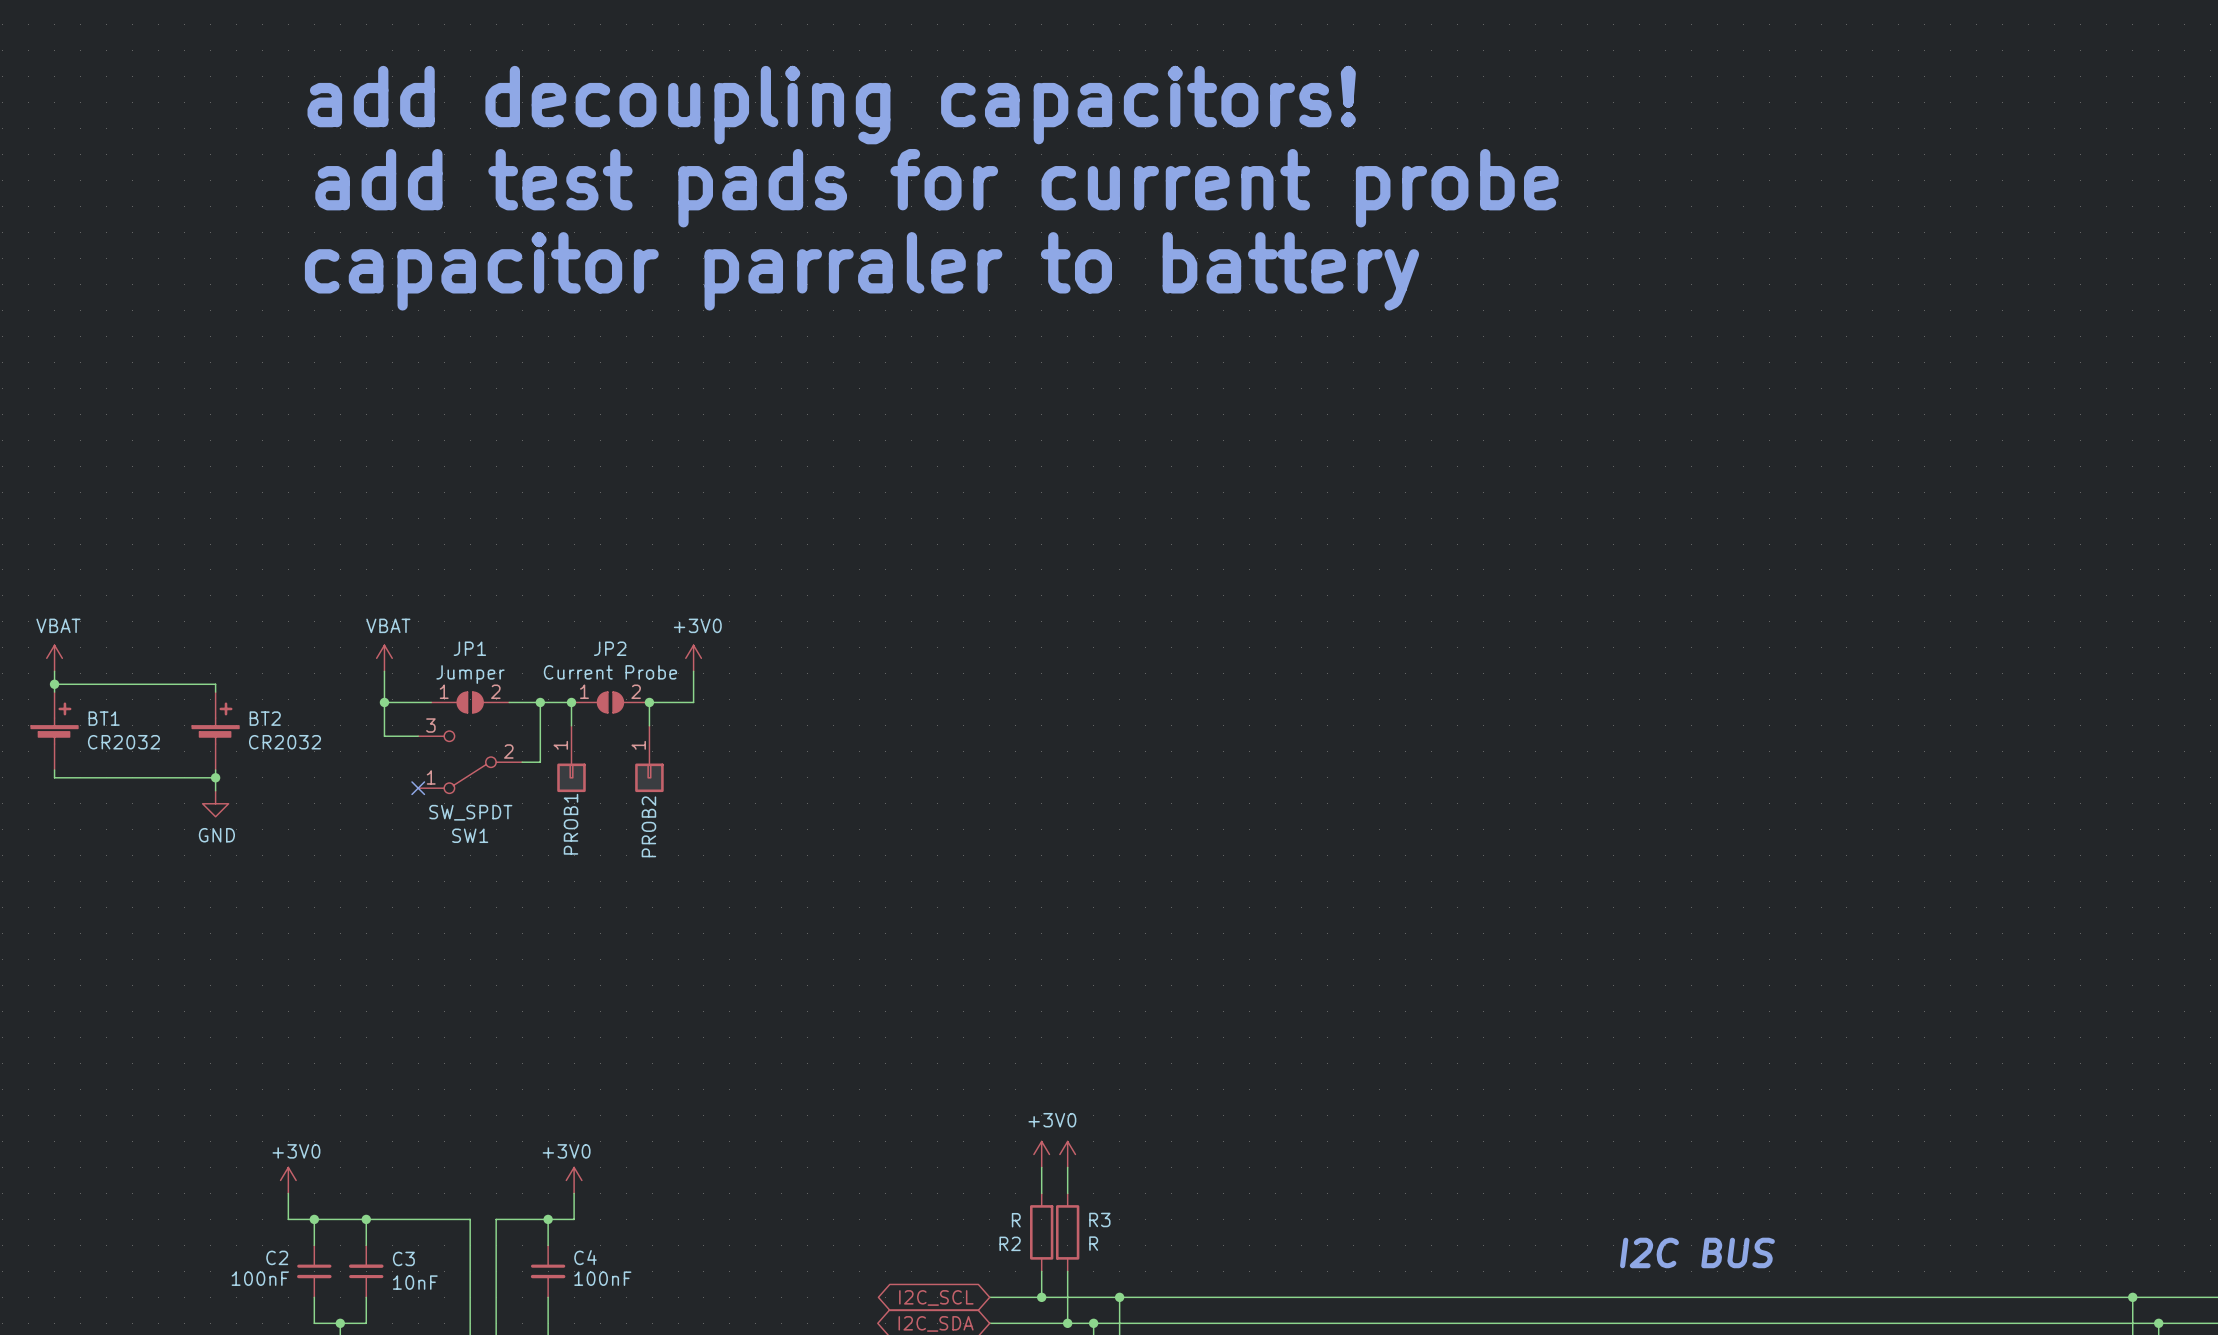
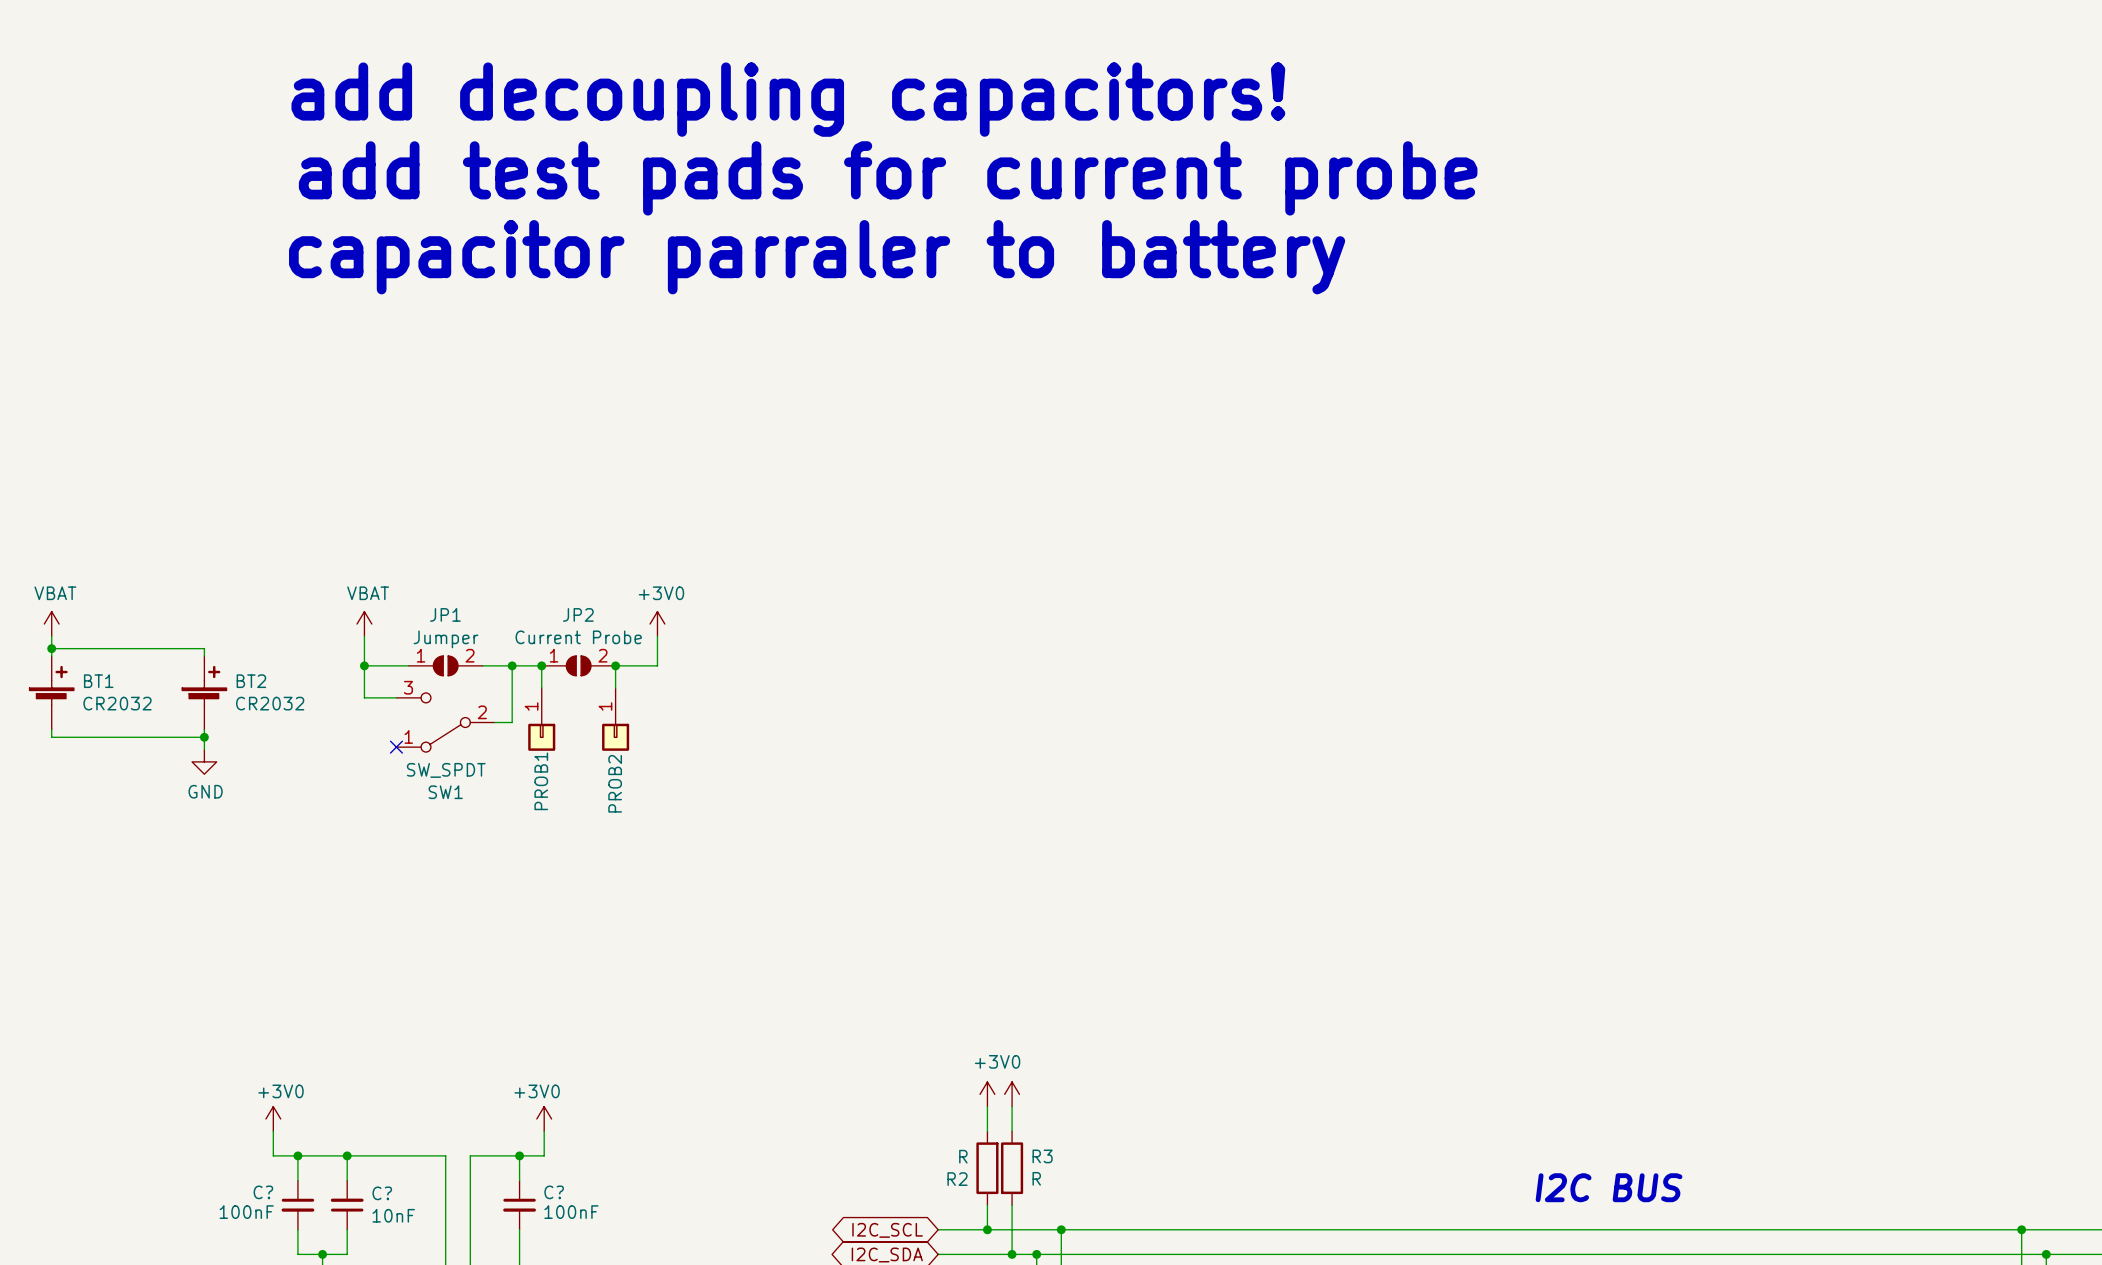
C2 name: C2 (277, 1257) -> C? (263, 1192)
C4 name: C4 (585, 1257) -> C? (554, 1192)
C3 name: C3 (403, 1258) -> C? (382, 1193)

